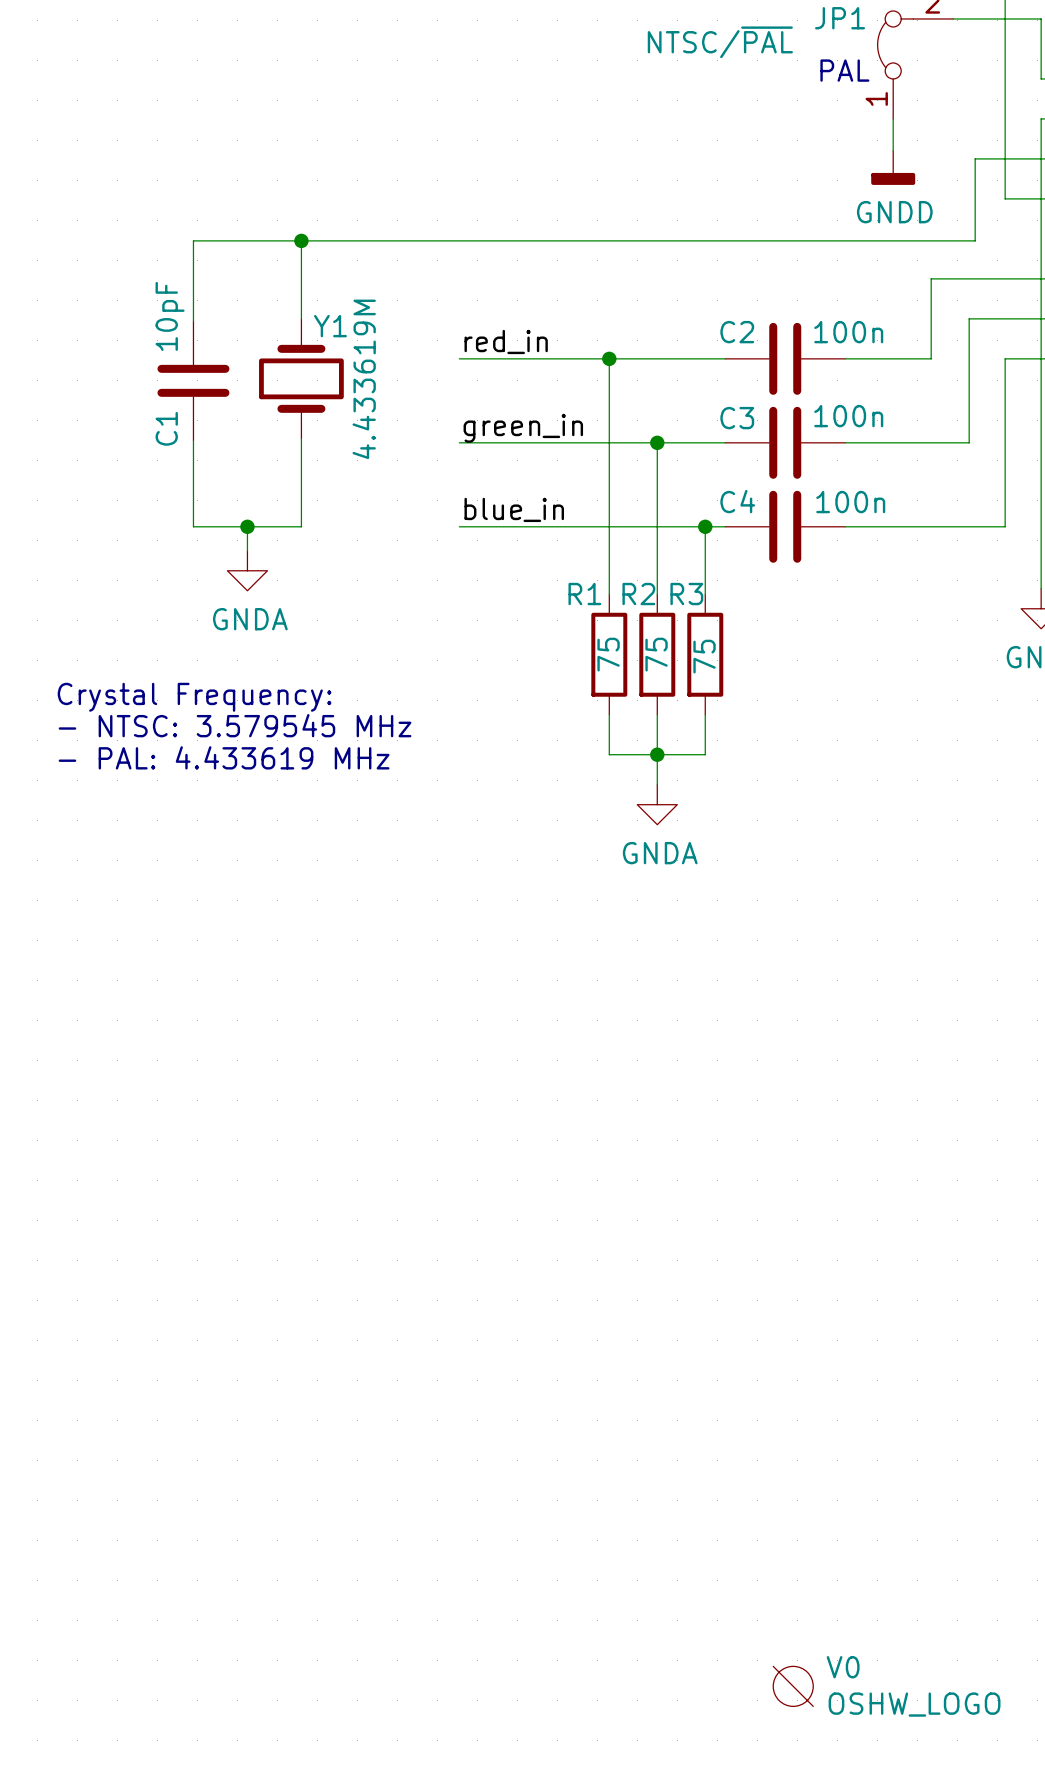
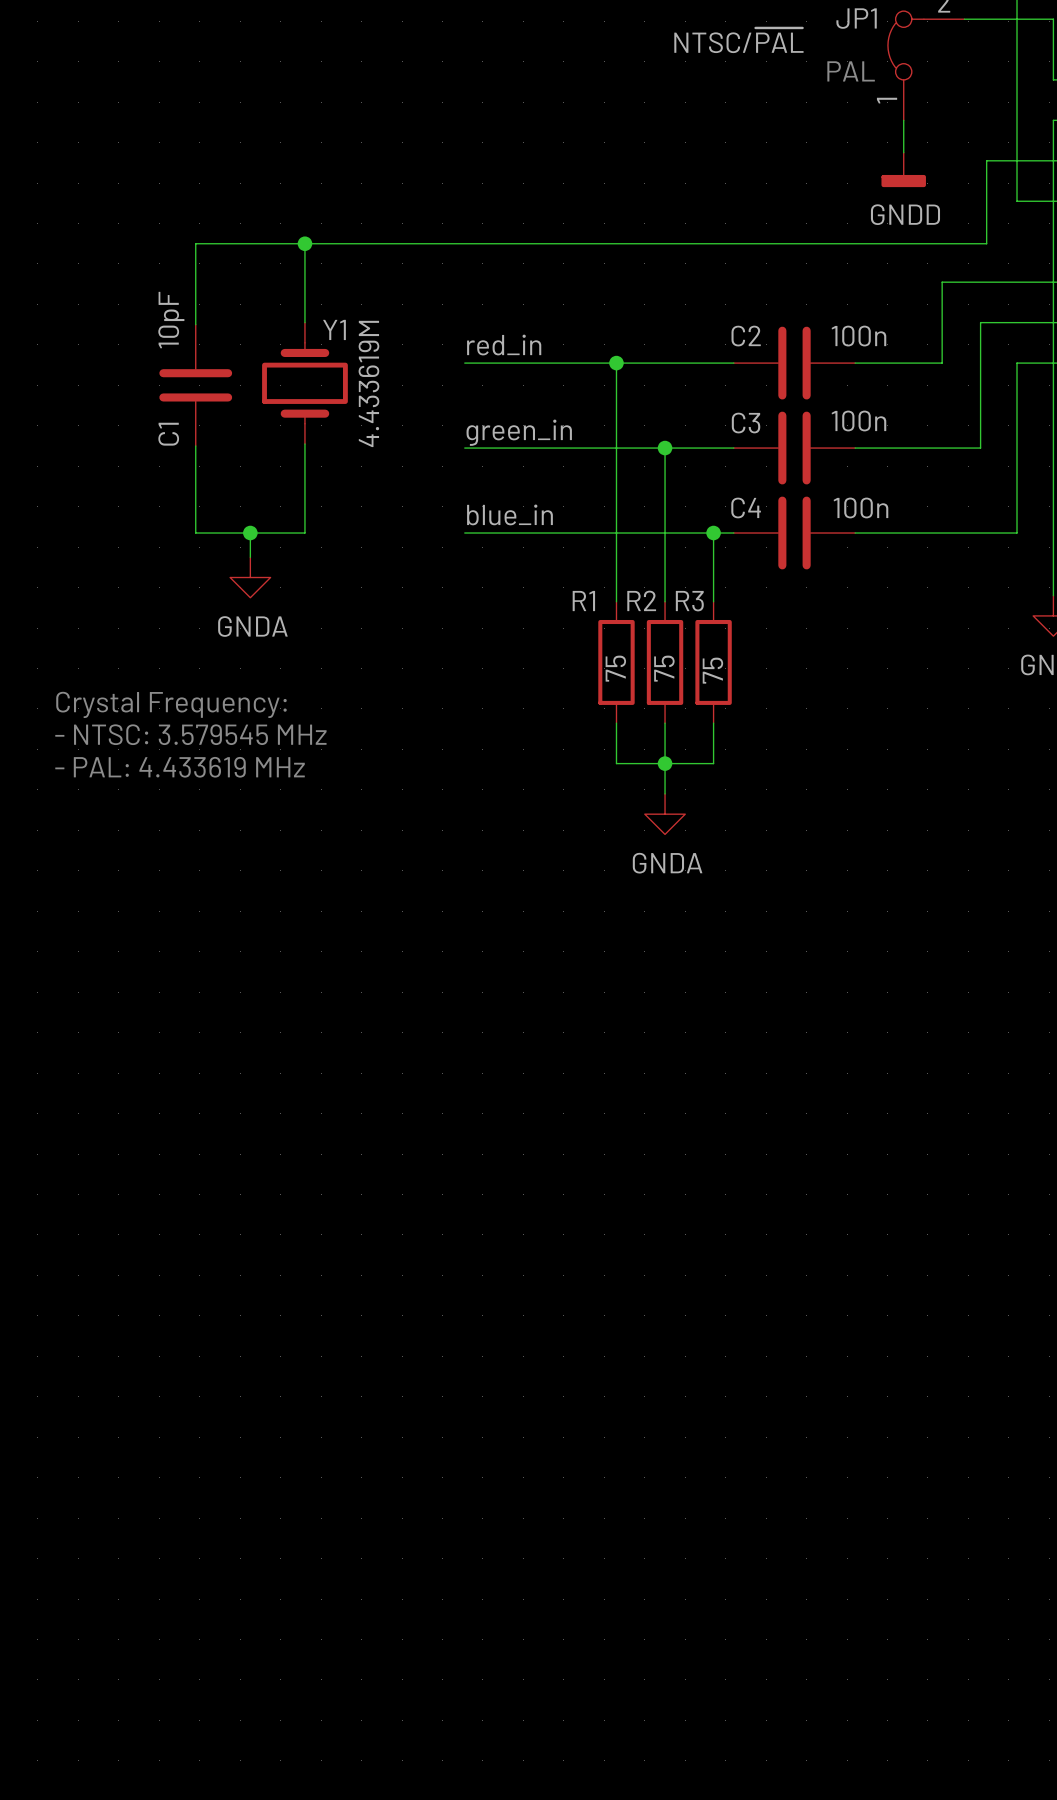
V0: OSHW_LOGO (793, 1686) -> none

